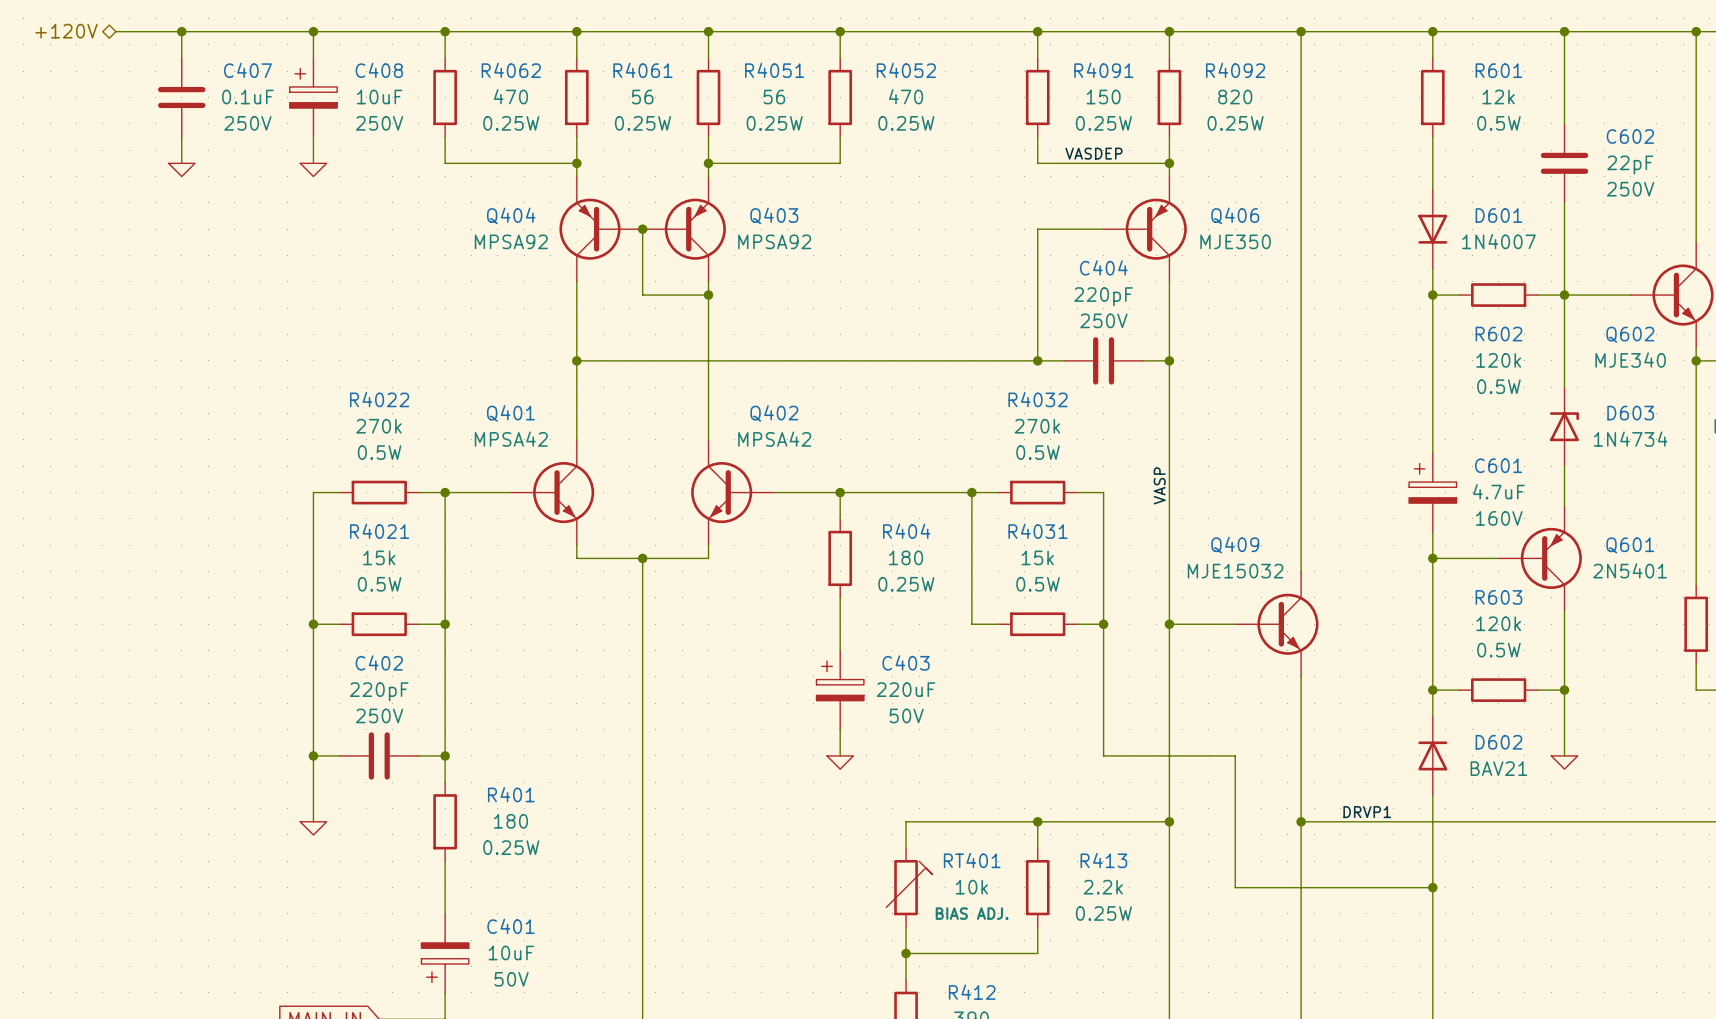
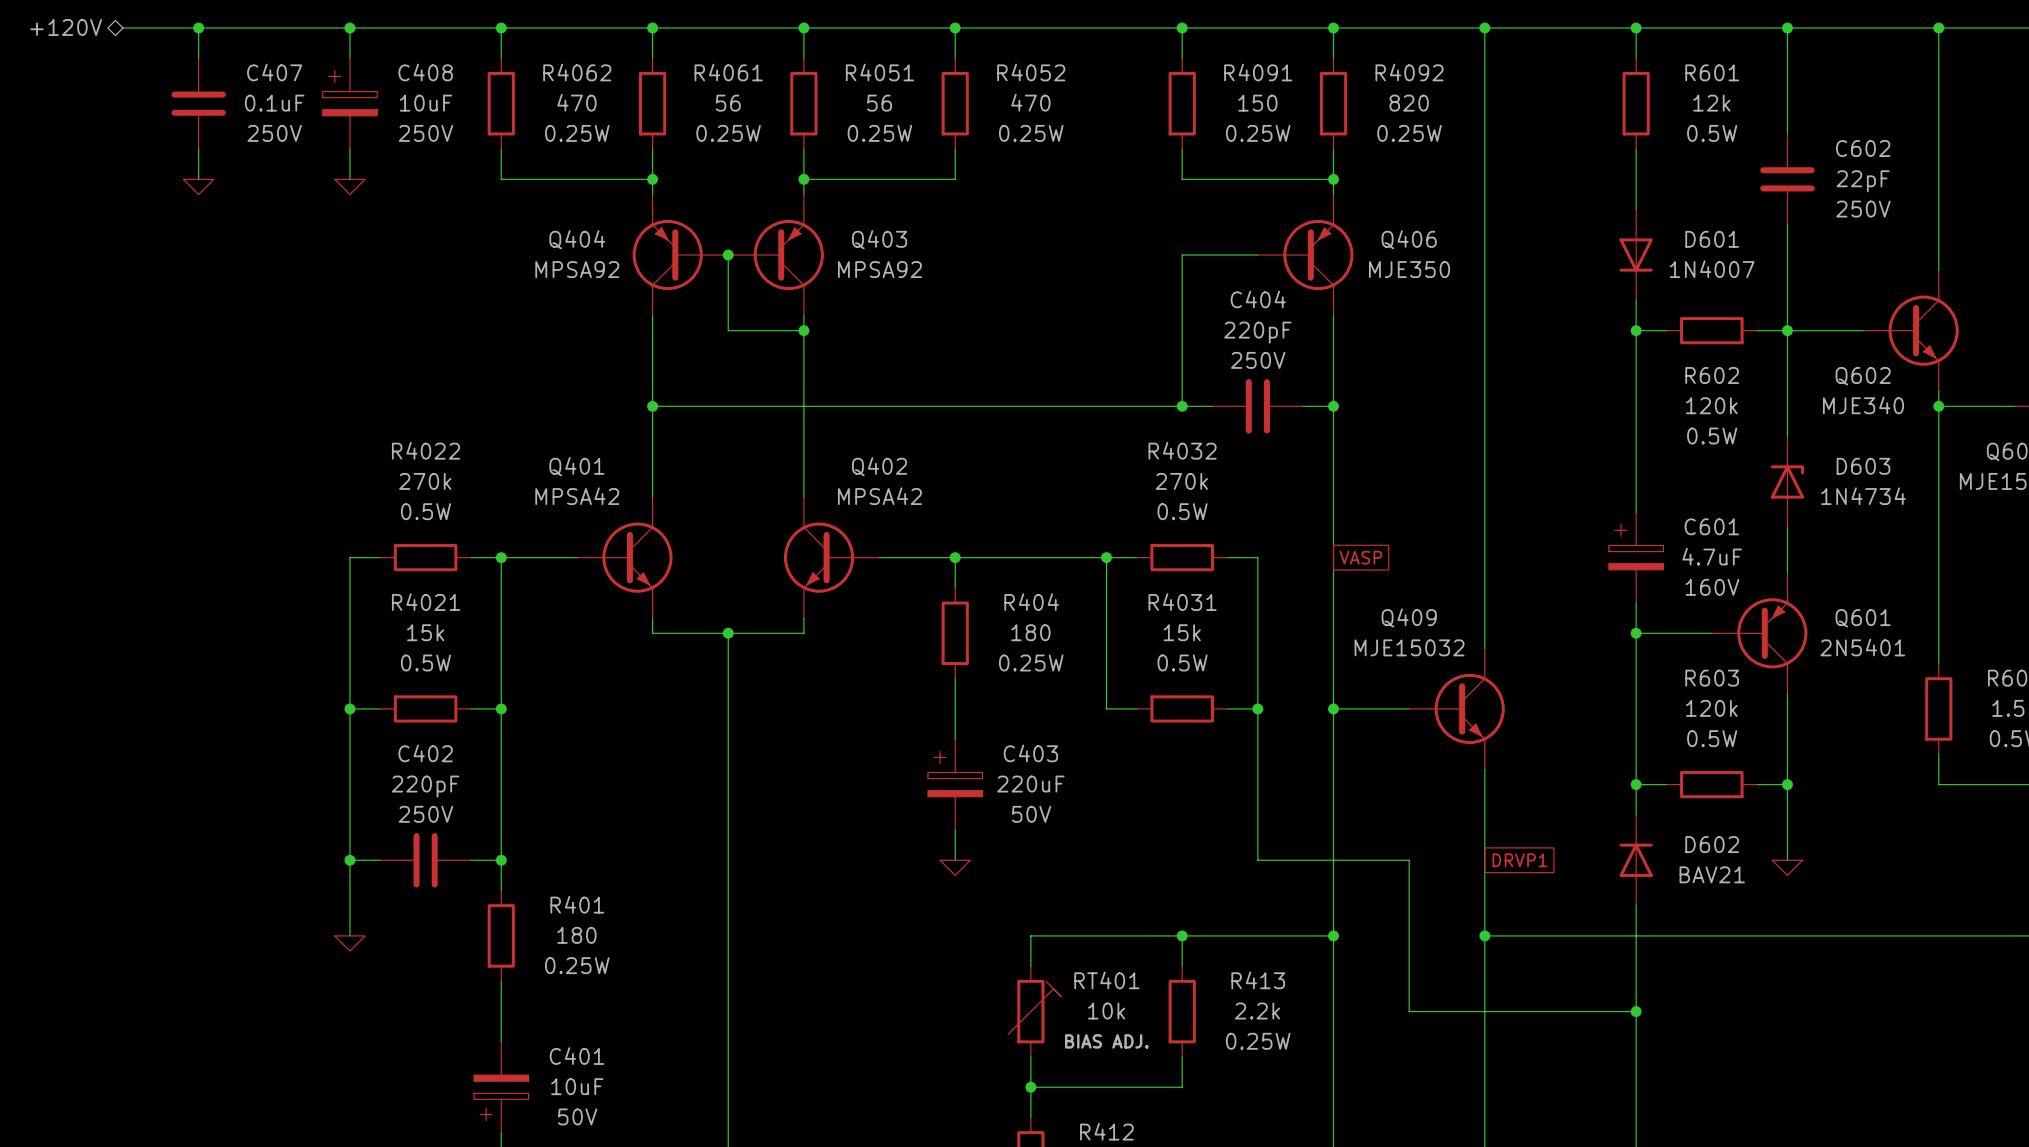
label: VASDEP (1093, 153) -> none
label: VASP (1159, 485) -> none
global label: none -> VASP (1360, 557)
global label: none -> DRVP1 (1519, 860)
label: DRVP1 (1367, 812) -> none

